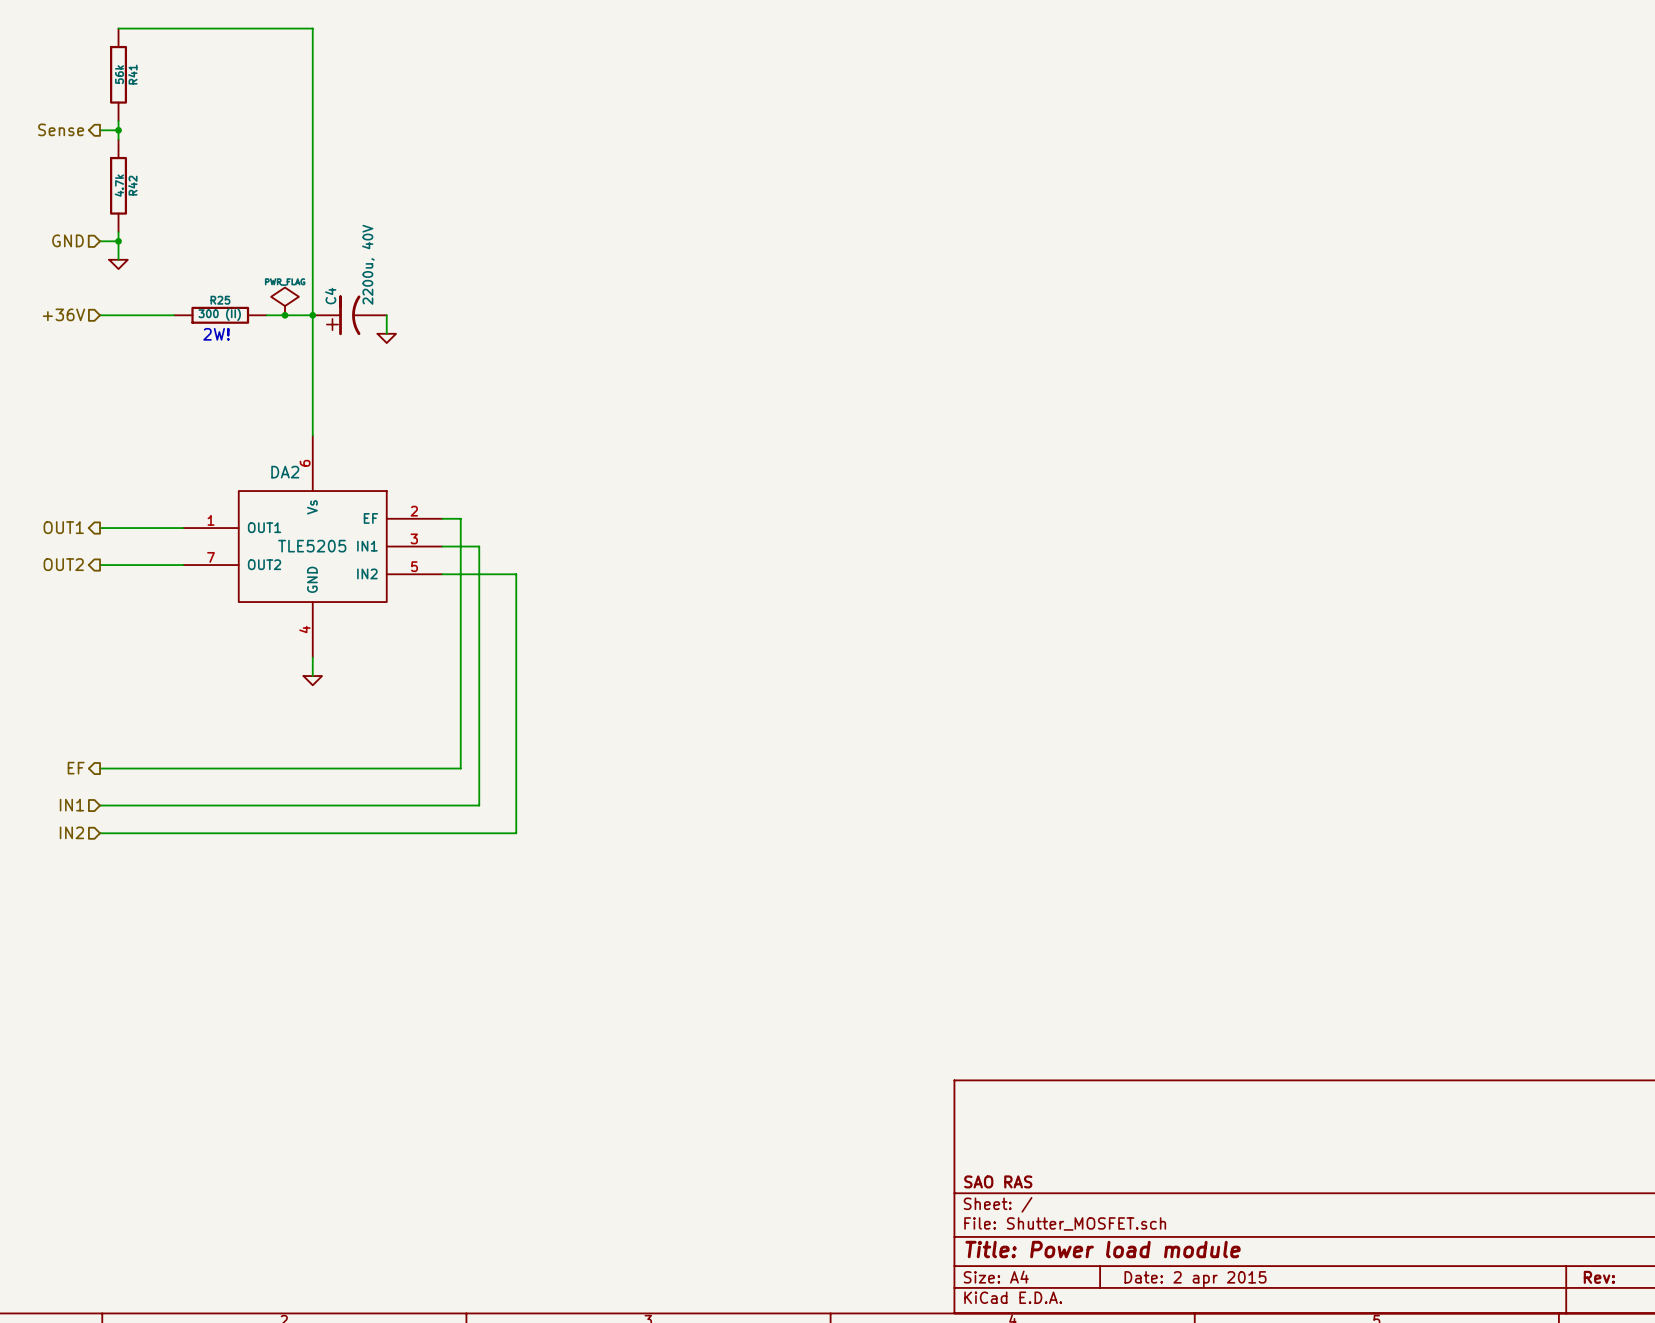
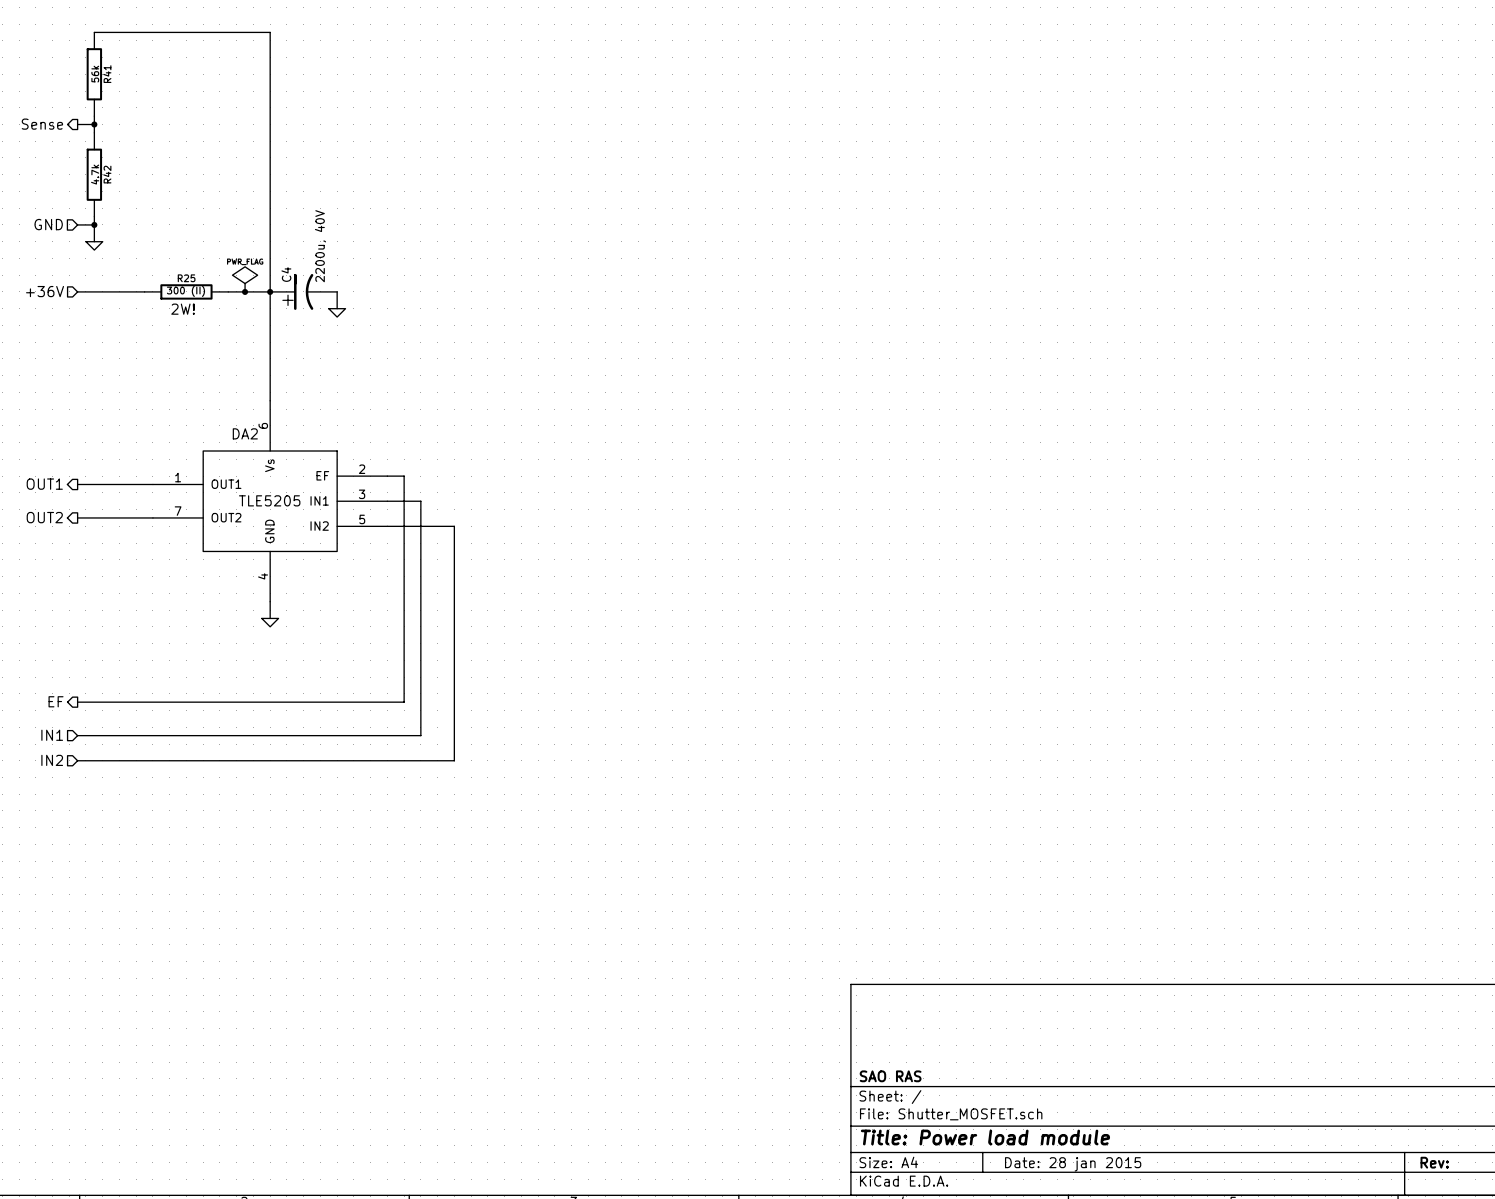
title block: Date: 2 apr 2015 (1195, 1279) -> Date: 28 jan 2015 (1073, 1164)

